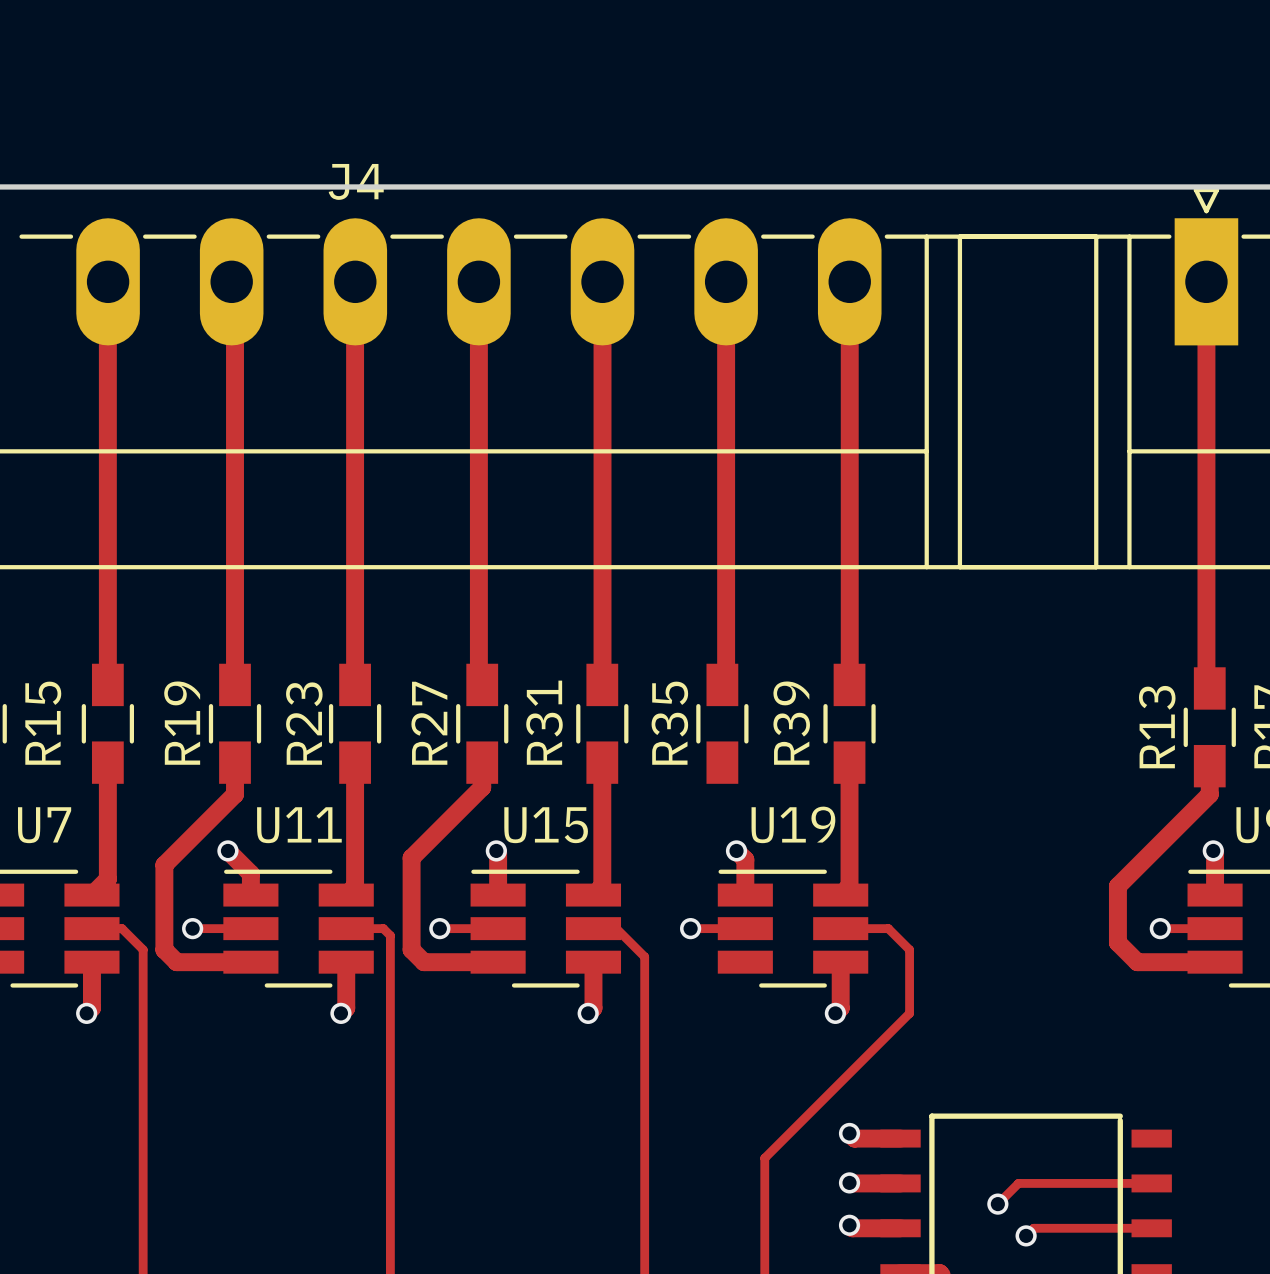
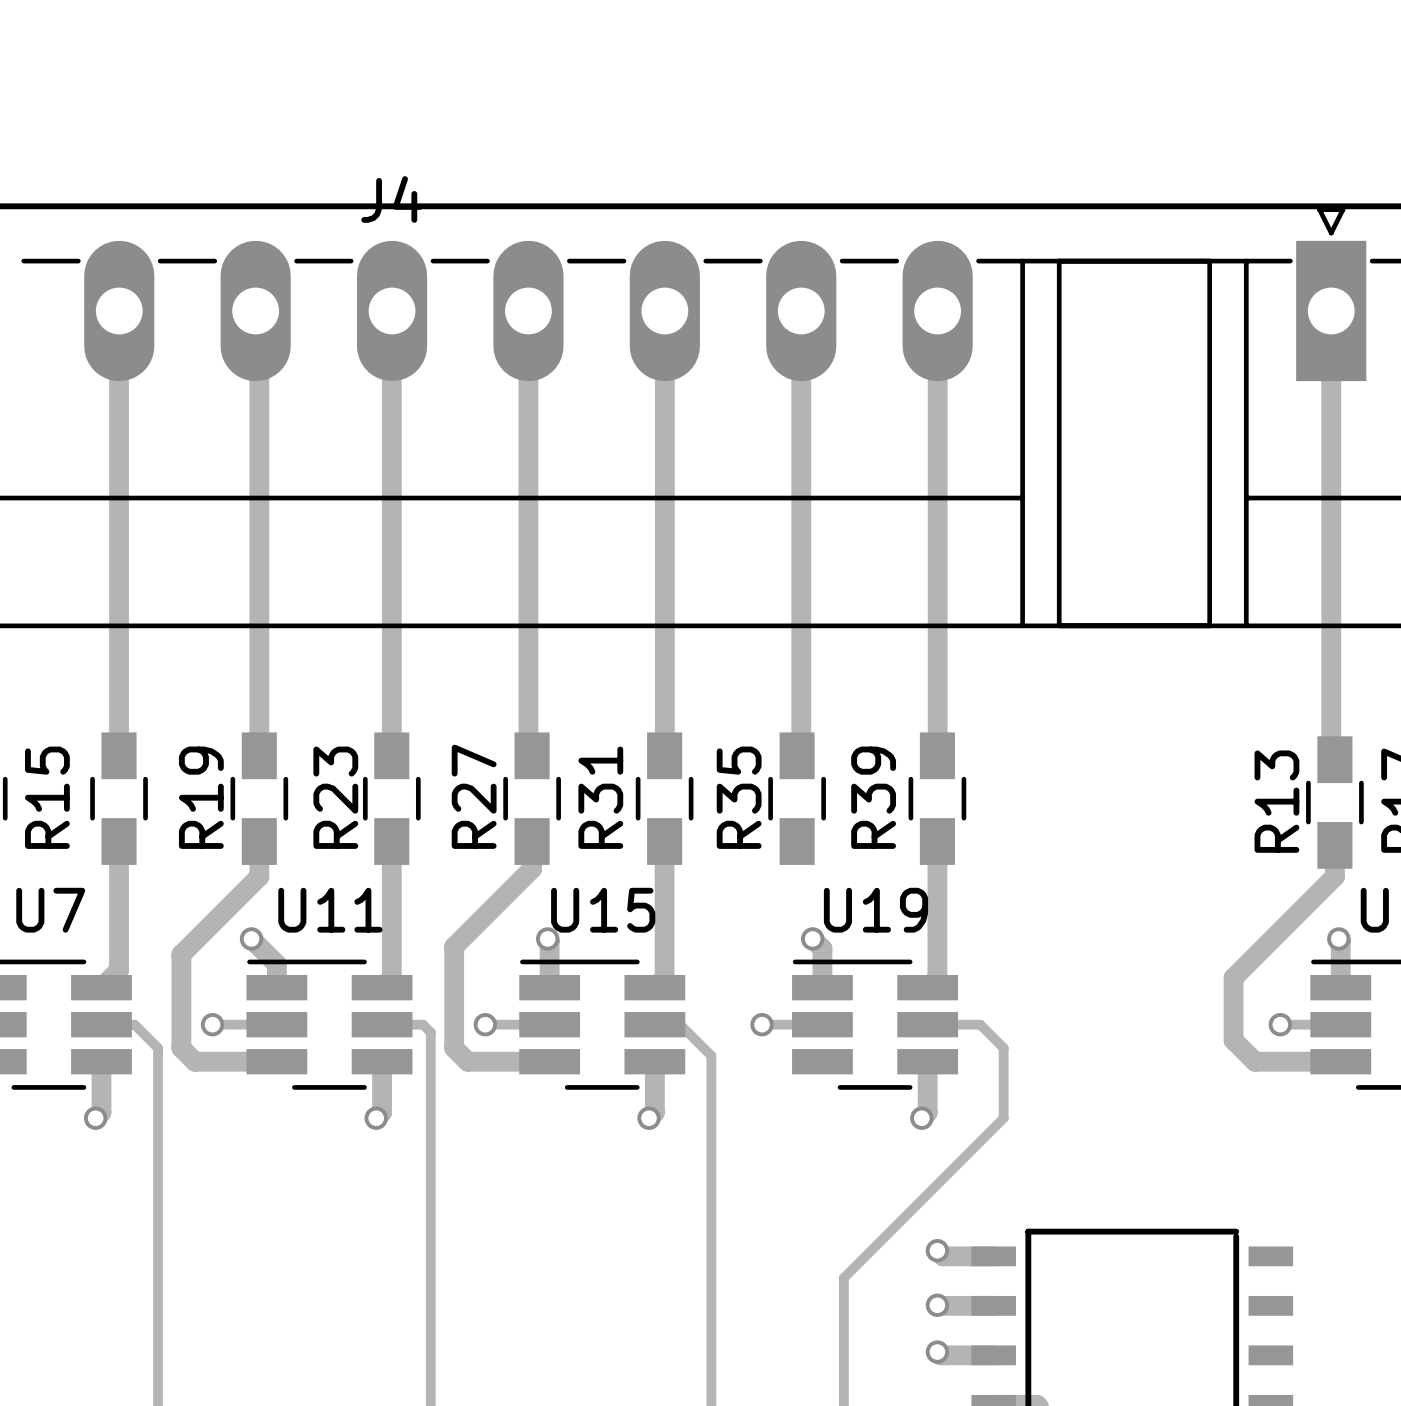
track: (1151, 1183) (1018, 1183) (997, 1204) -> none
via: (997, 1204) -> none
track: (1151, 1228) (1033, 1228) (1026, 1235) -> none
via: (1026, 1235) -> none

